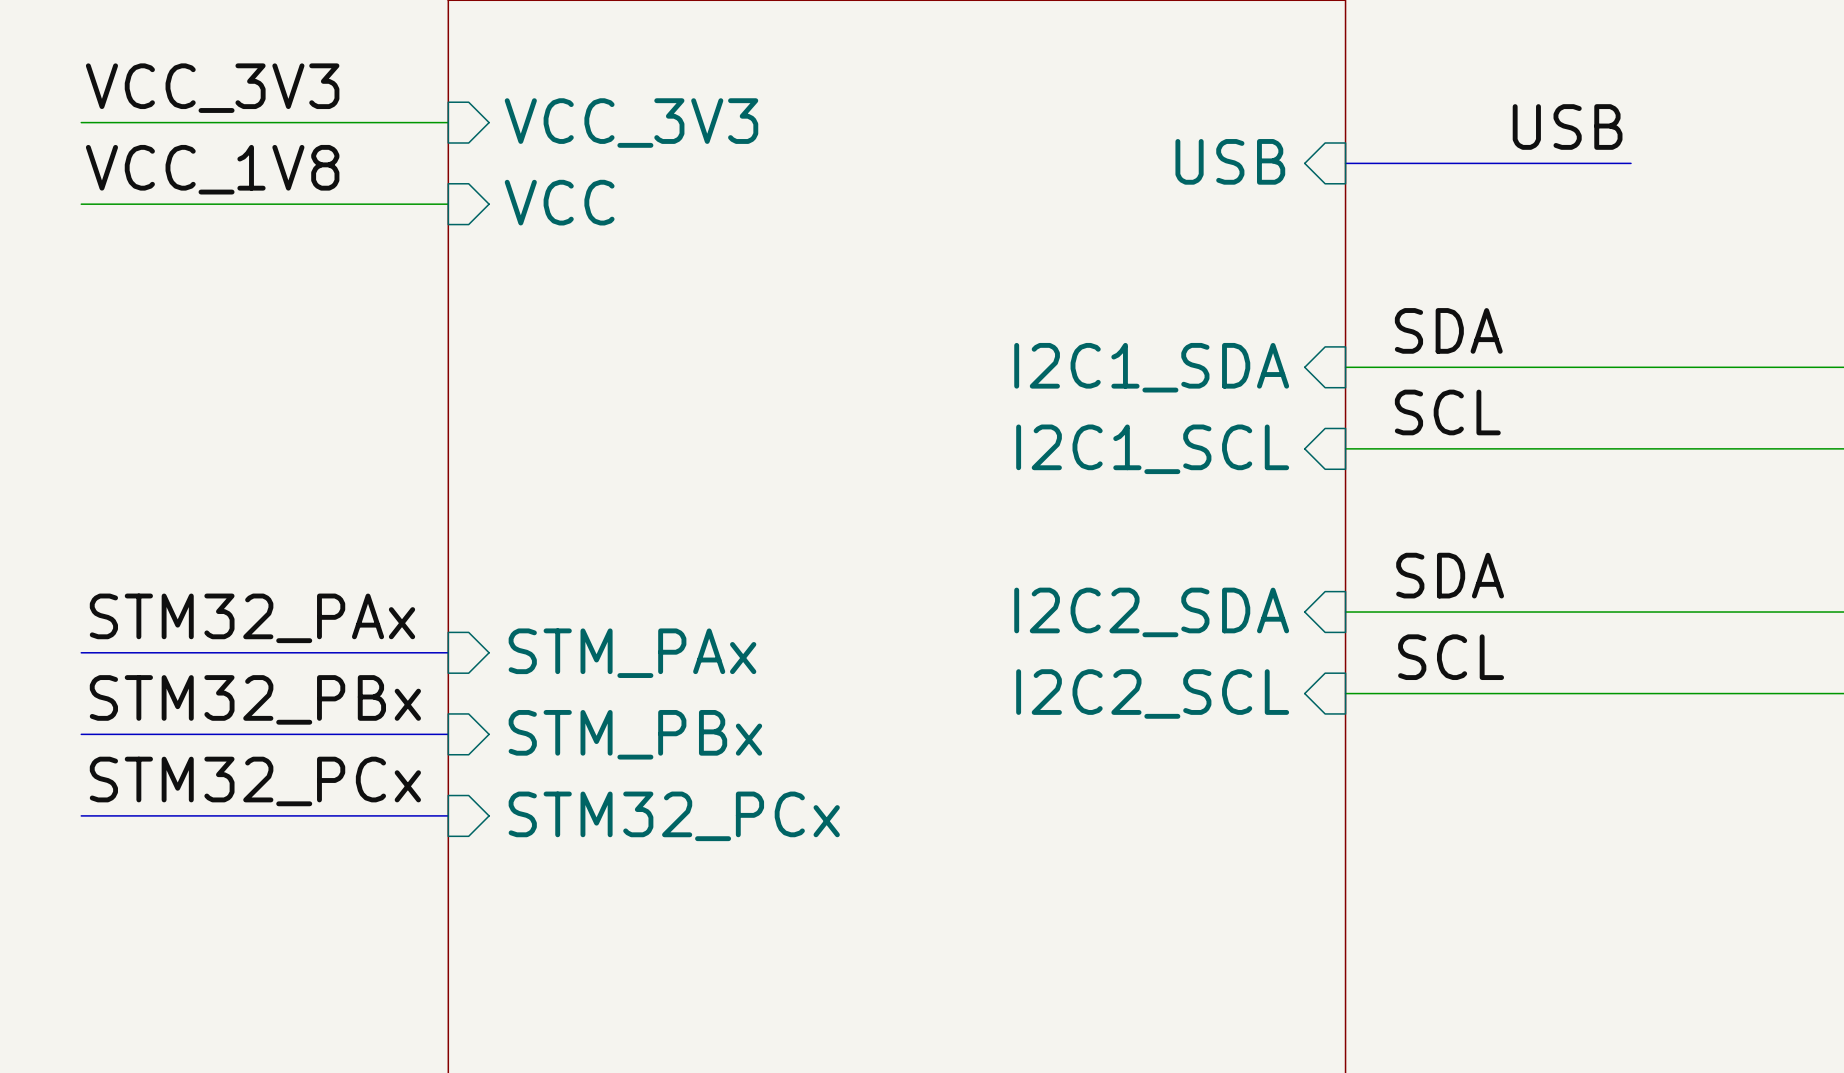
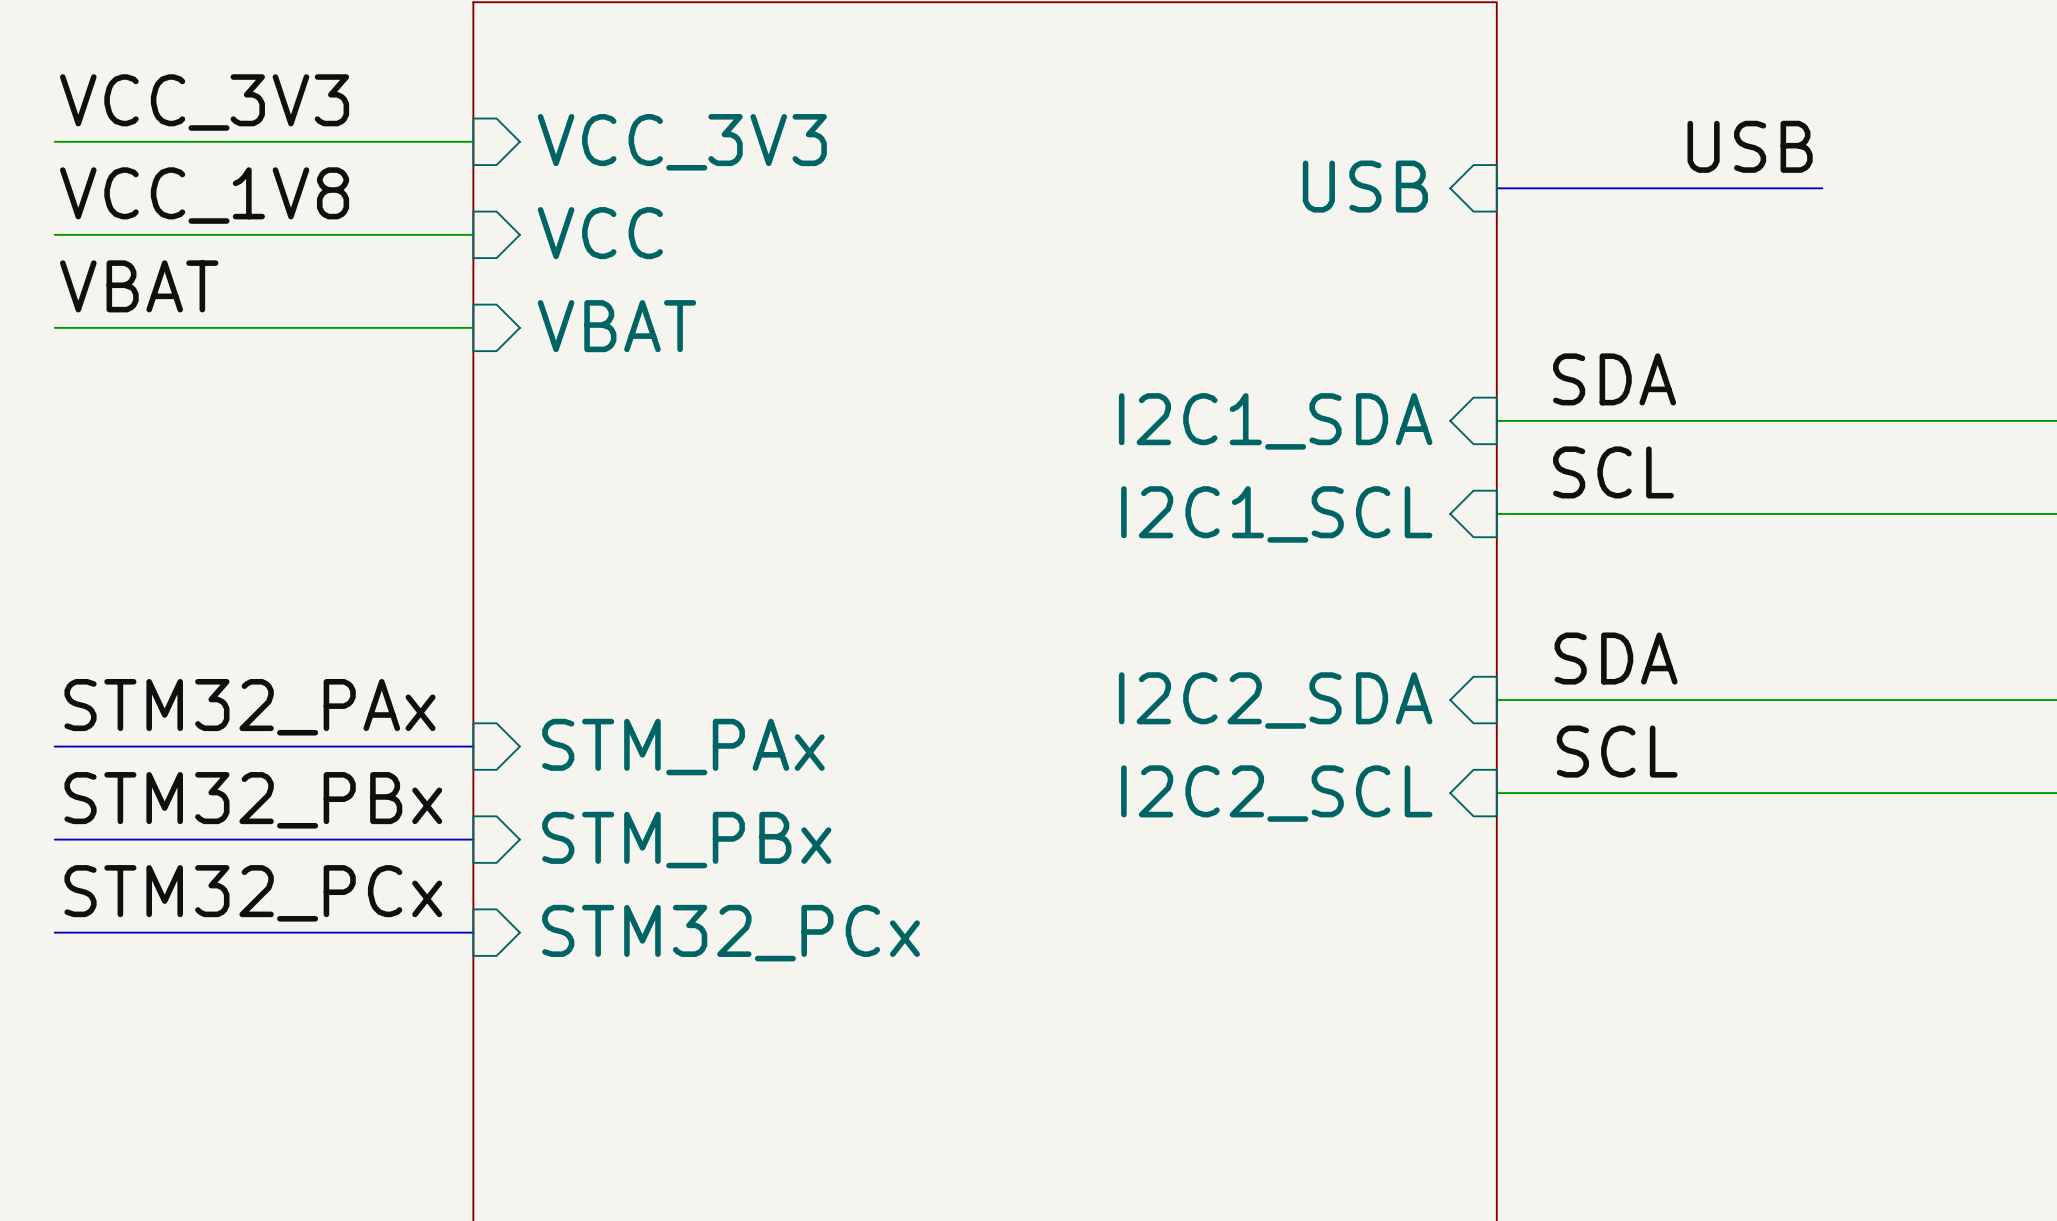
label: none -> VBAT (139, 286)
sheet pin: none -> VBAT (616, 326)
wire: none -> (54, 327) (473, 327)

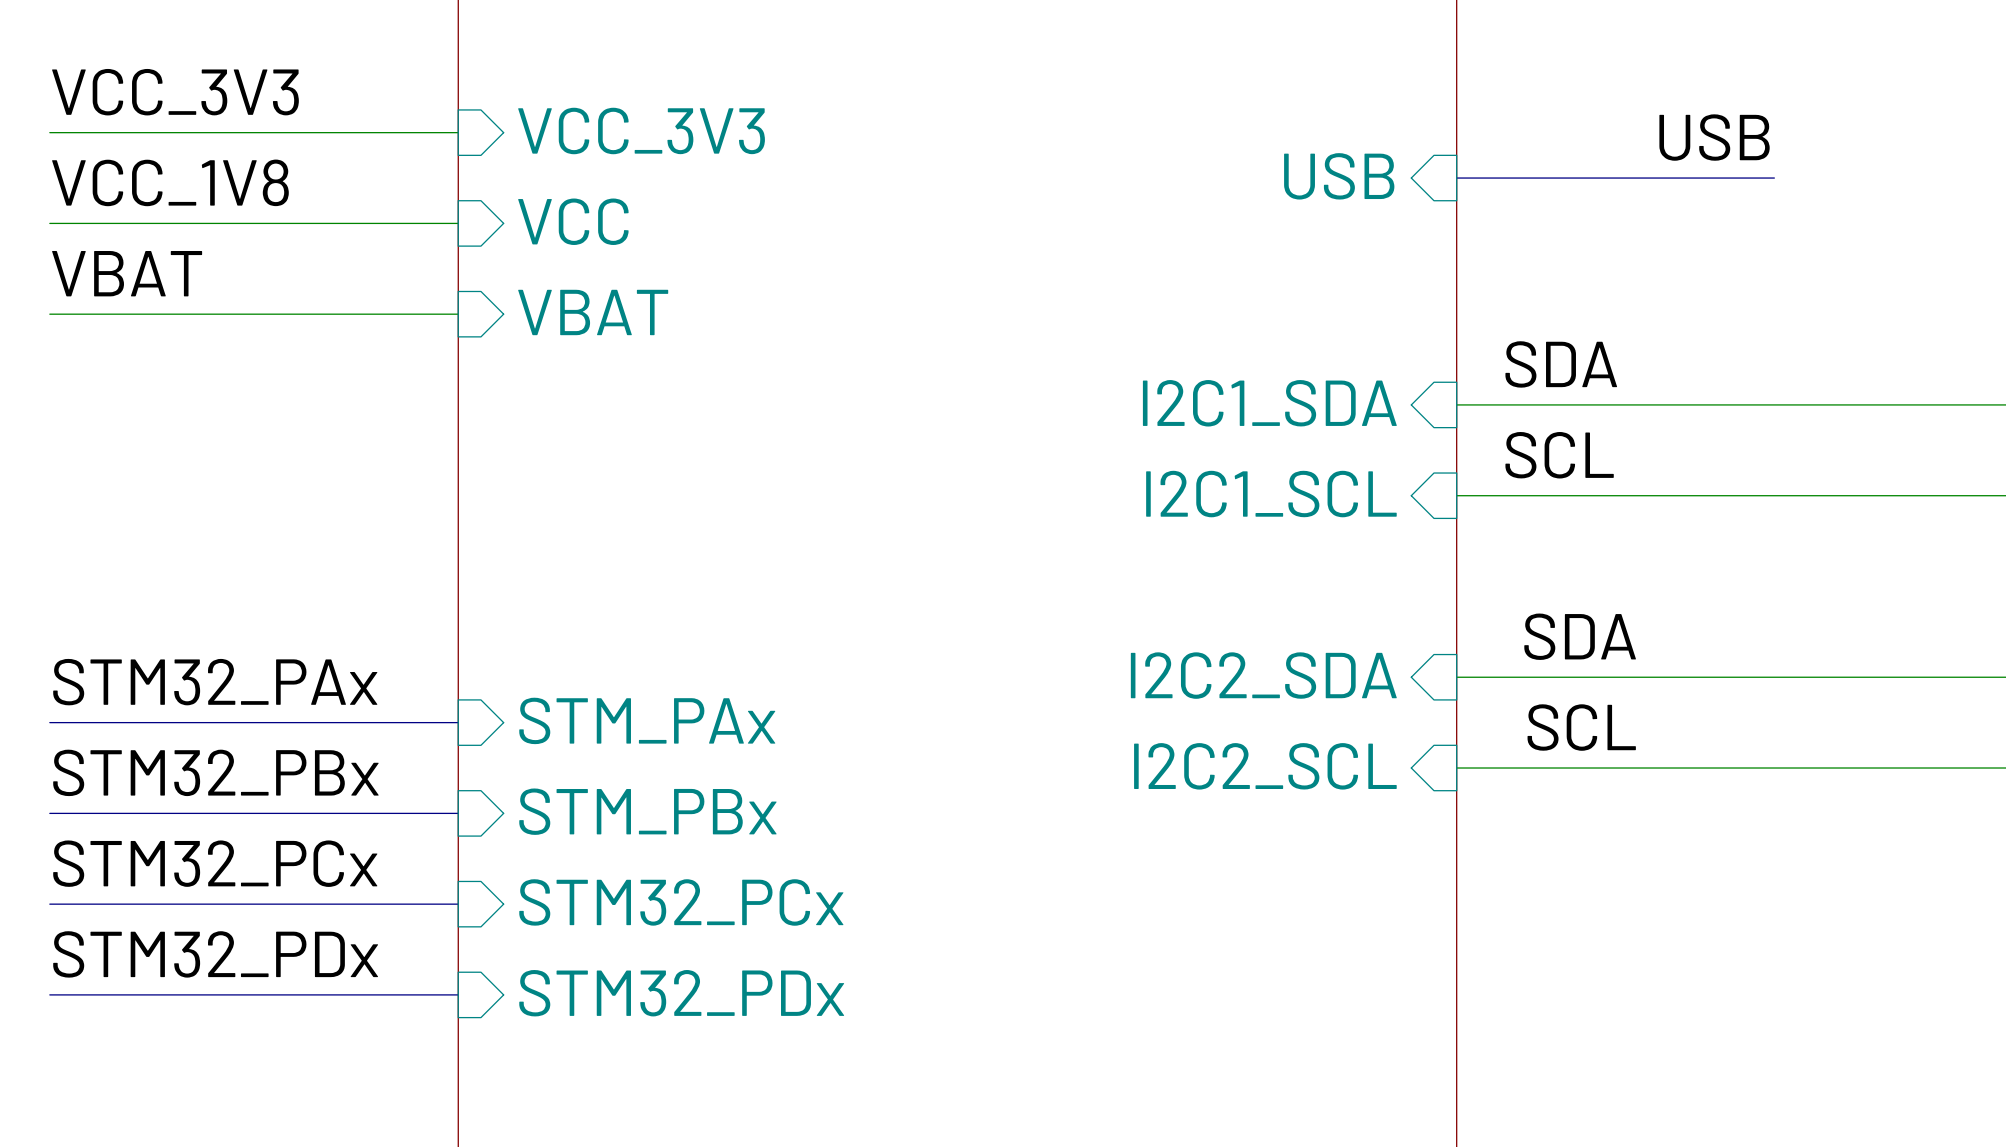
label: none -> STM32_PDx (215, 954)
bus: none -> (49, 994) (458, 994)
sheet pin: none -> STM32_PDx (681, 993)

